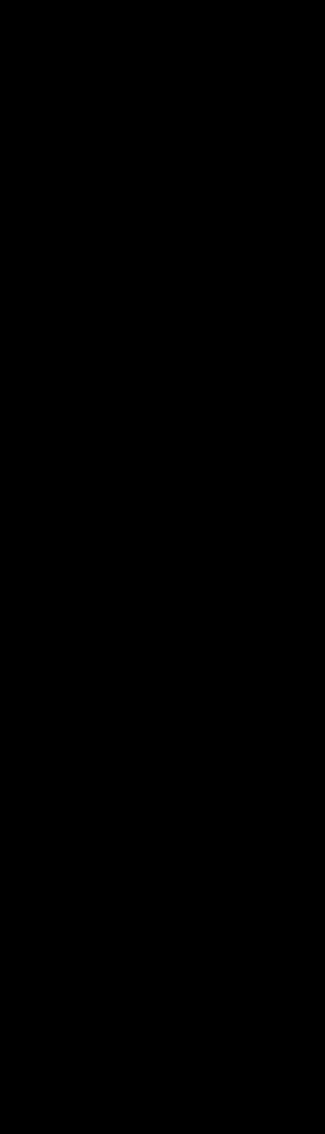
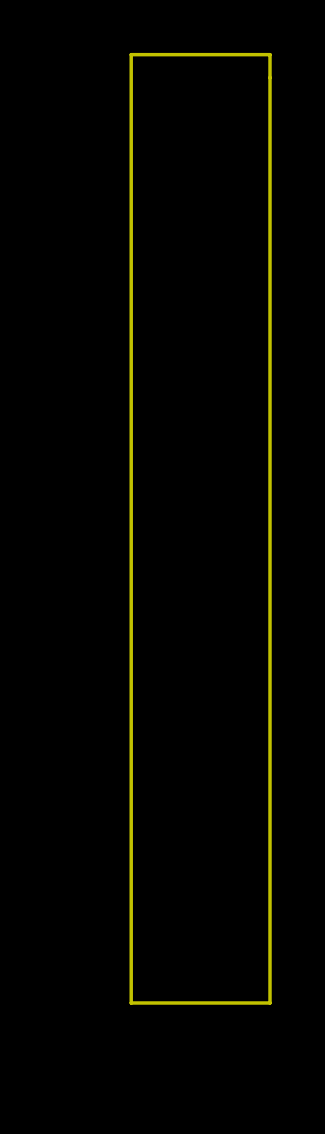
board edge: none -> (270, 54) (270, 1002) (131, 1002) (131, 54) (270, 54)

